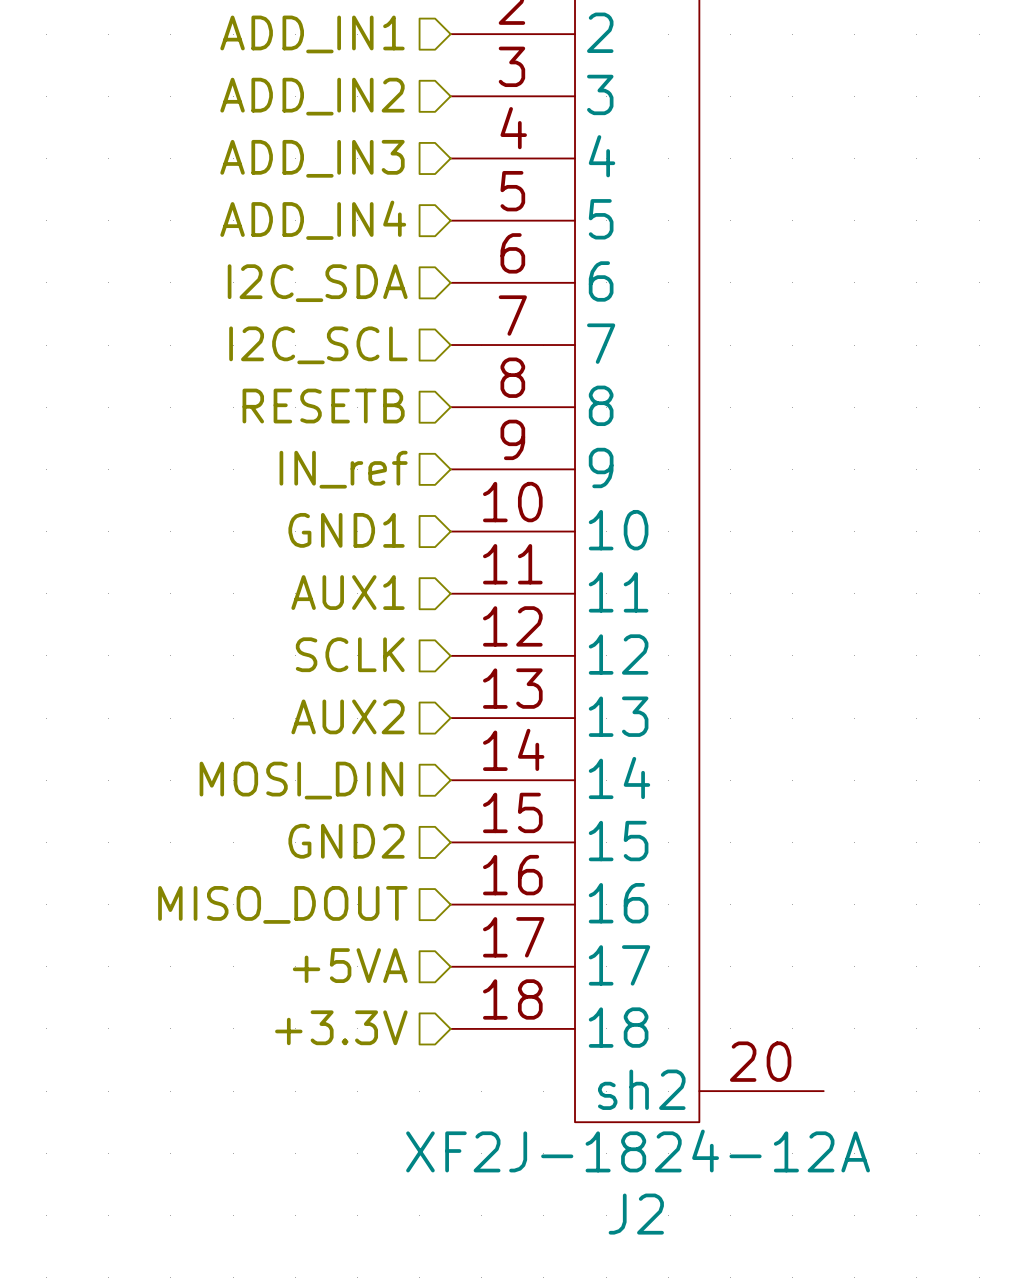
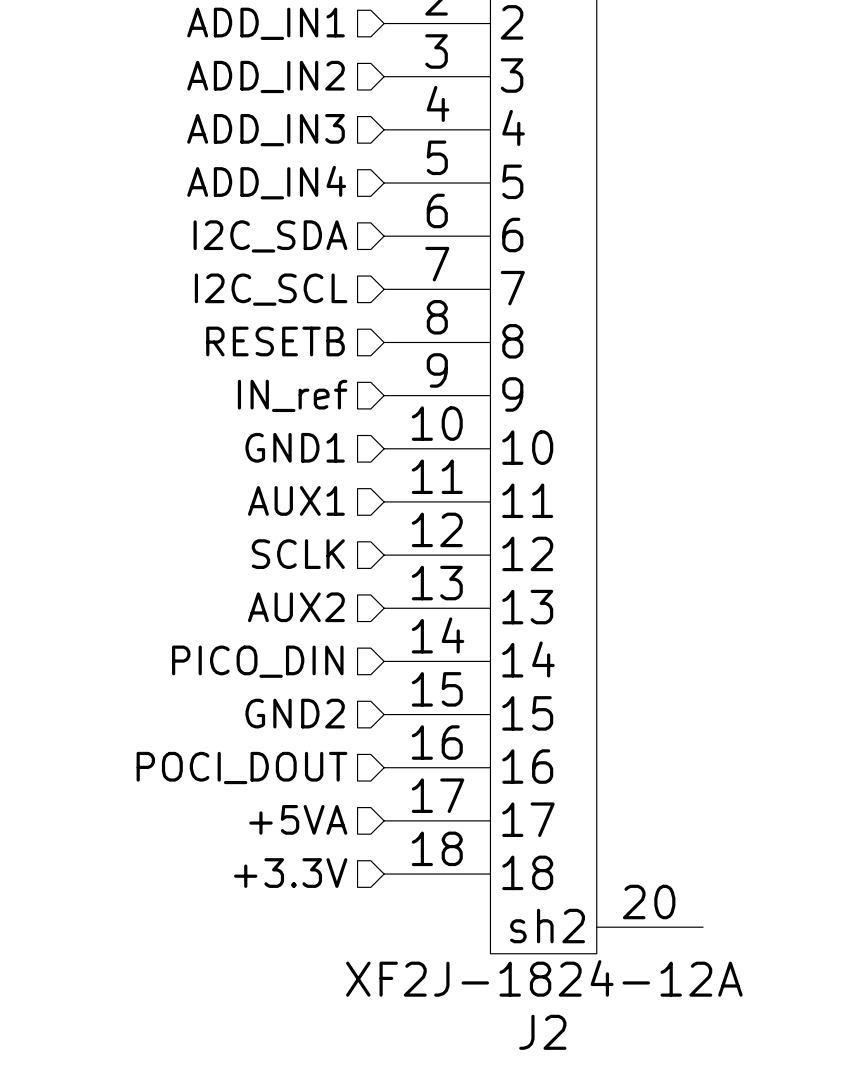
hierarchical label: MOSI_DIN (301, 780) -> PICO_DIN (257, 661)
hierarchical label: MISO_DOUT (282, 904) -> POCI_DOUT (241, 767)

